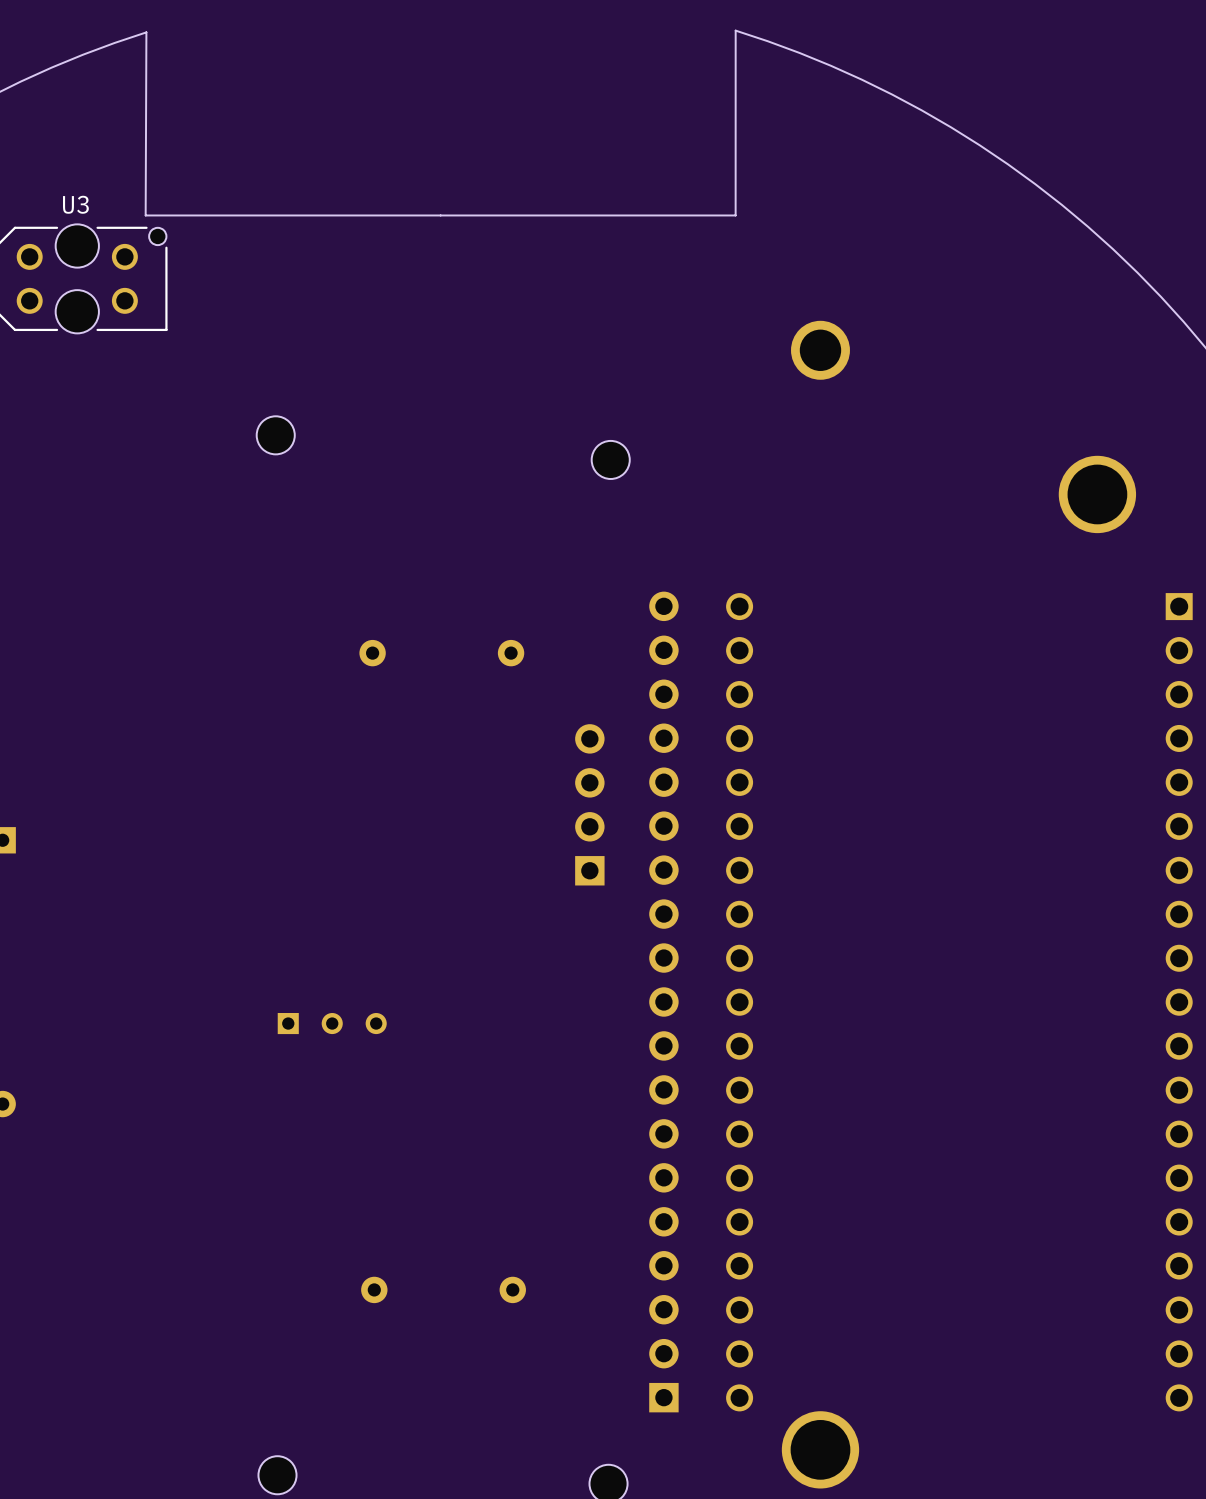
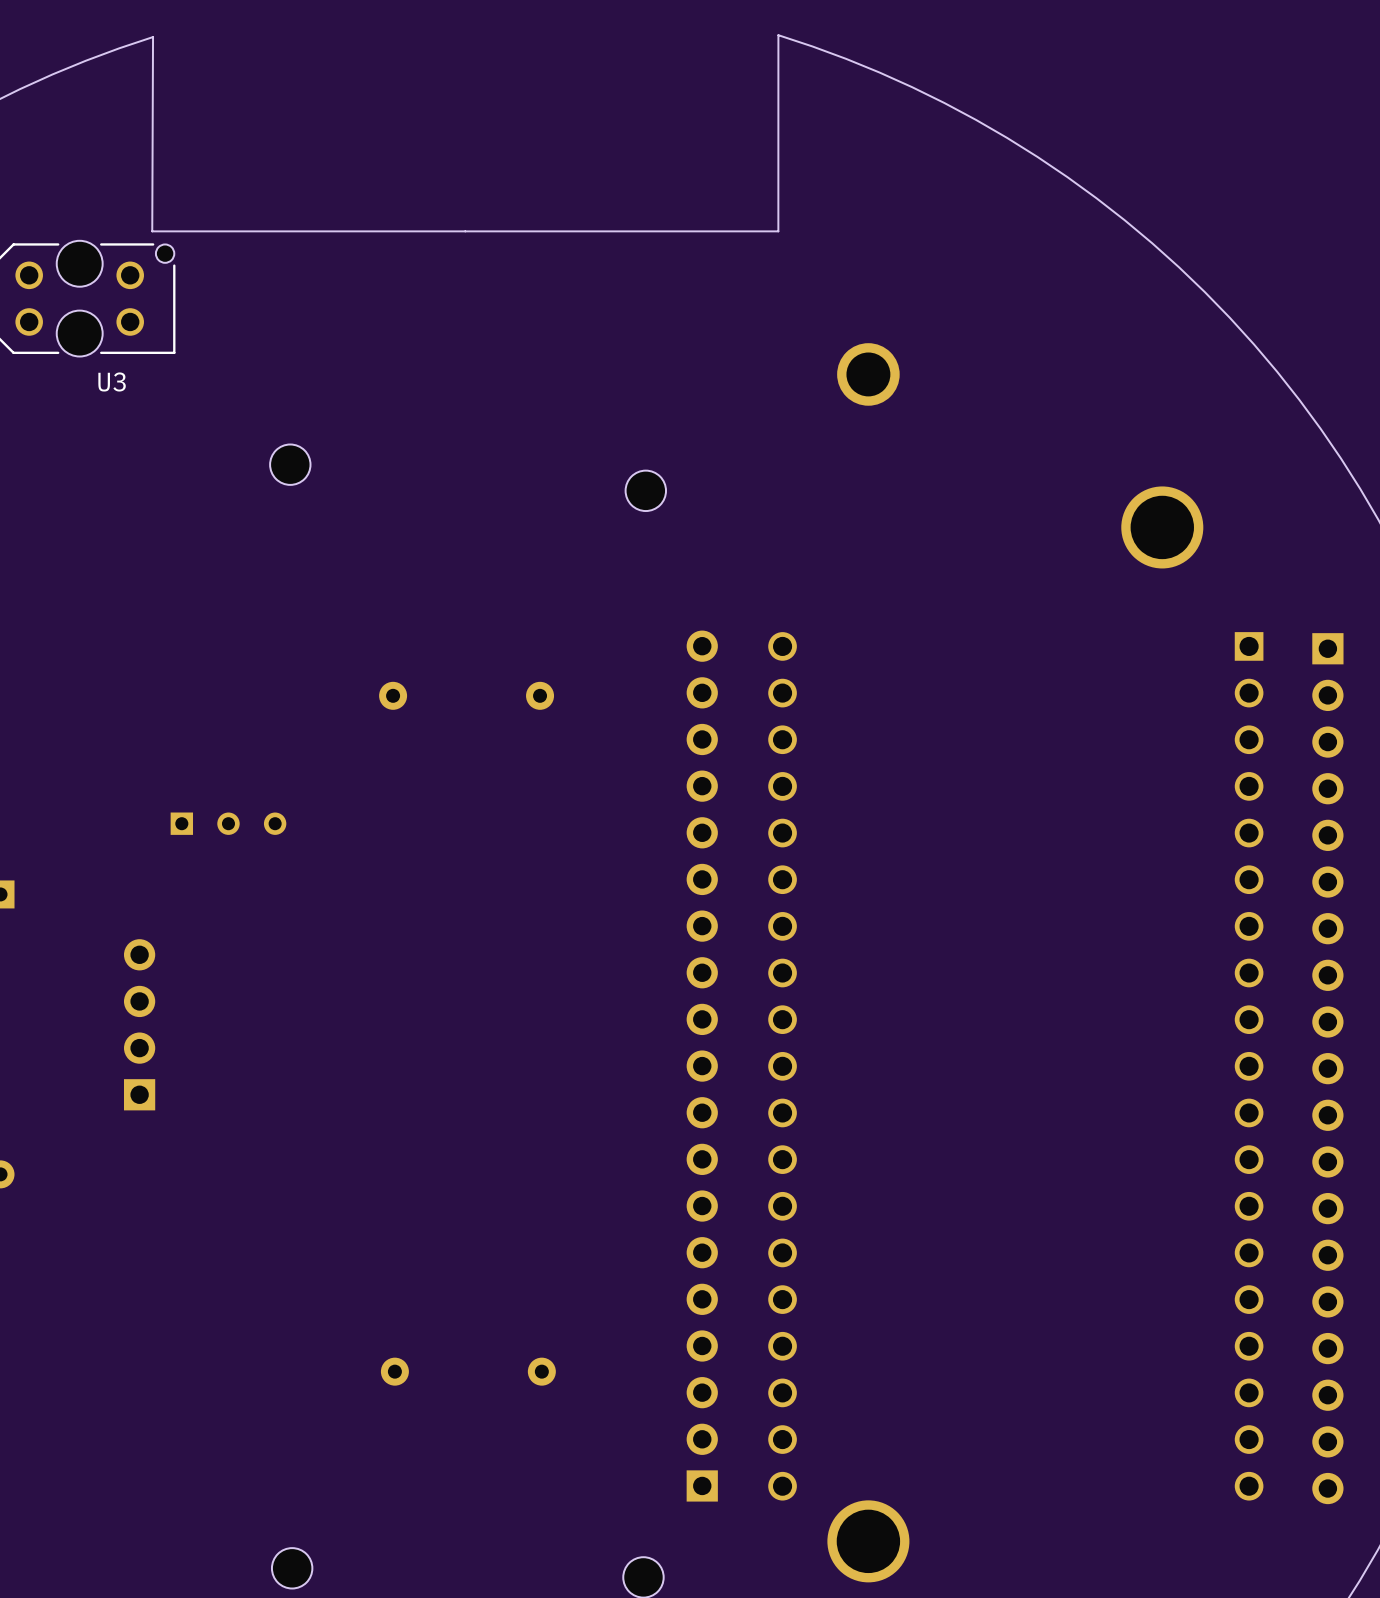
U3 name position: U3 (75, 204) -> U3 (112, 381)
part: (589, 804) -> none
part: none -> (139, 1024)
part position: (332, 1023) -> (228, 823)

